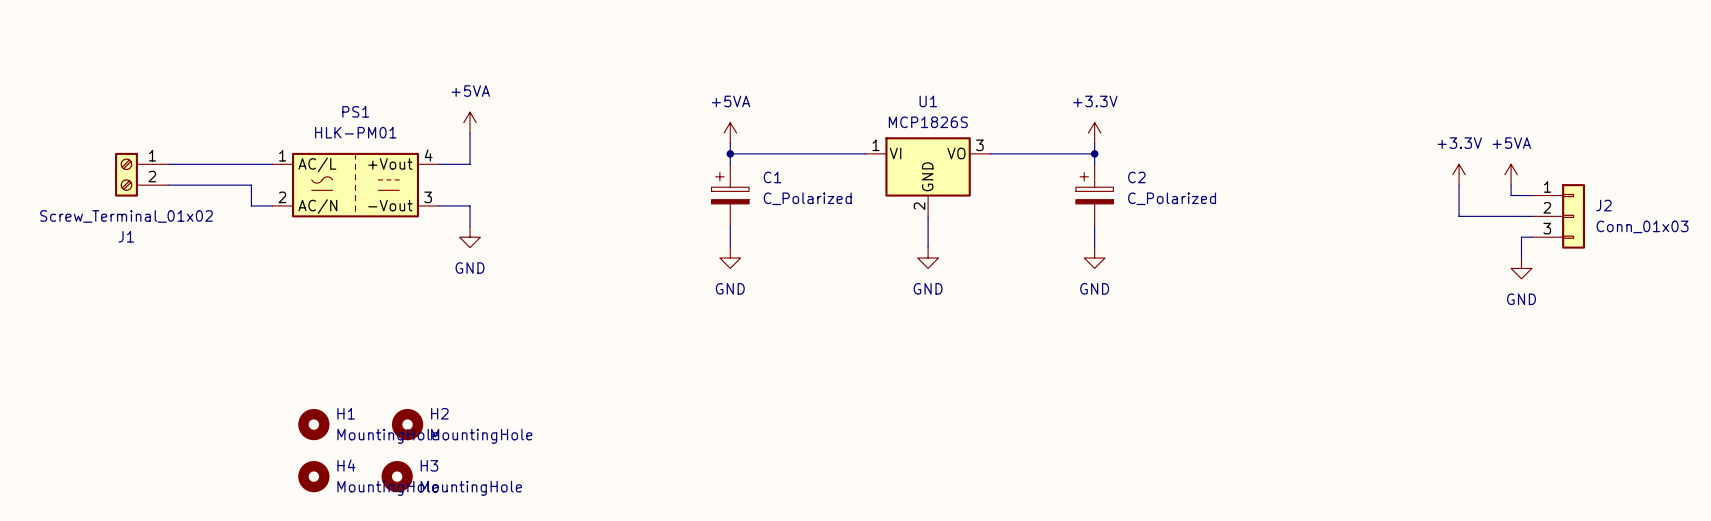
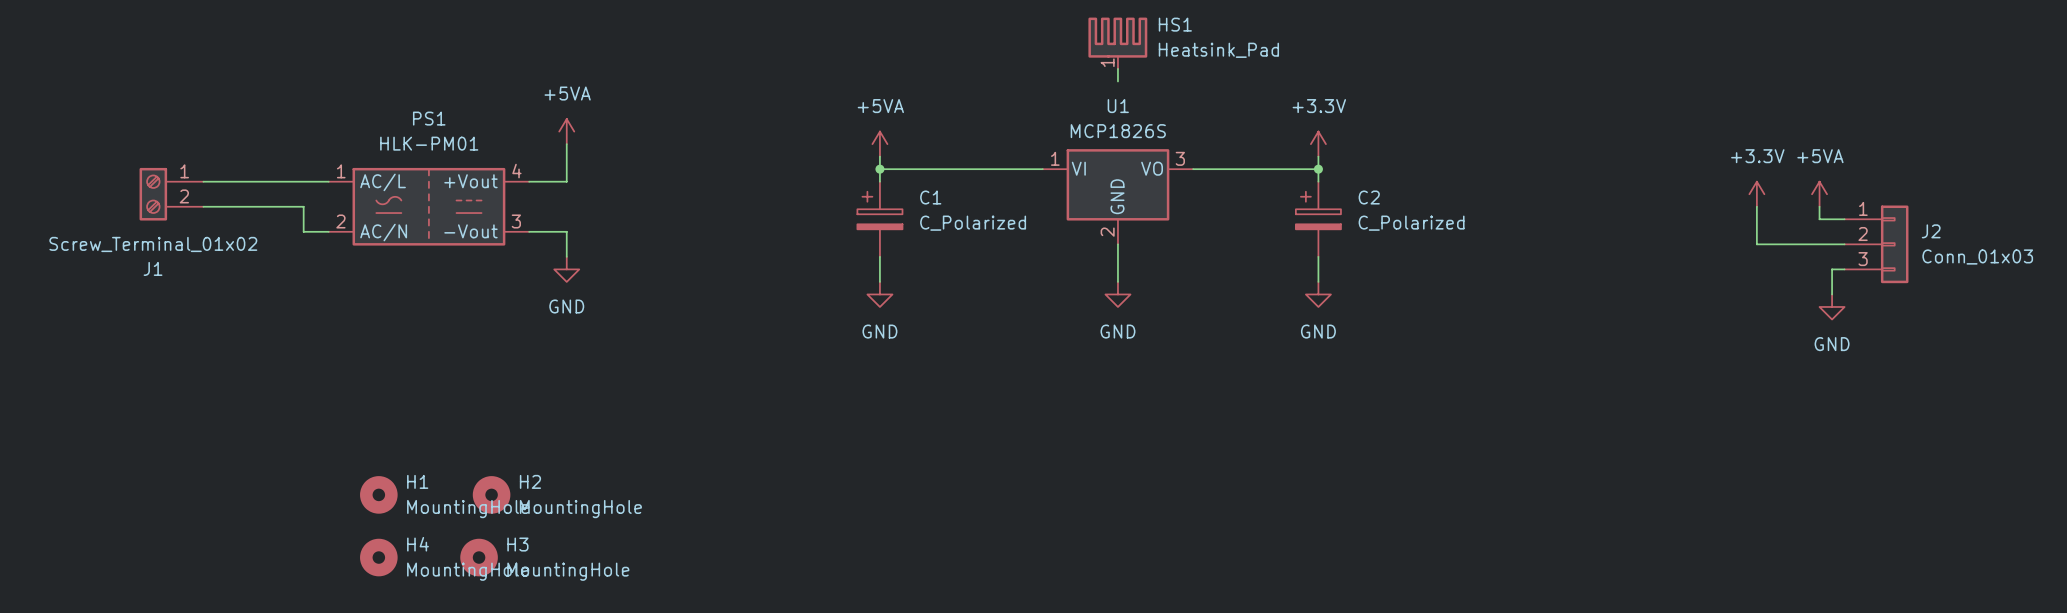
HS1: none -> Heatsink_Pad (1117, 43)
wire: none -> (1117, 68) (1117, 81)

